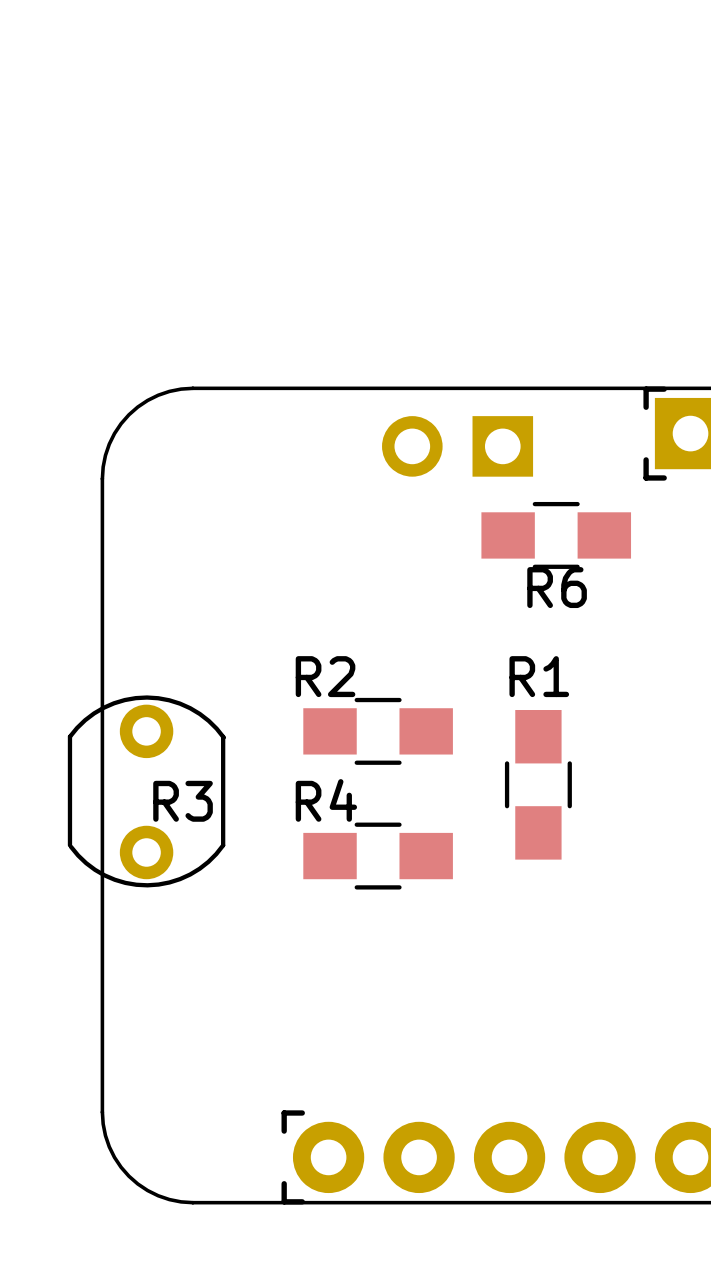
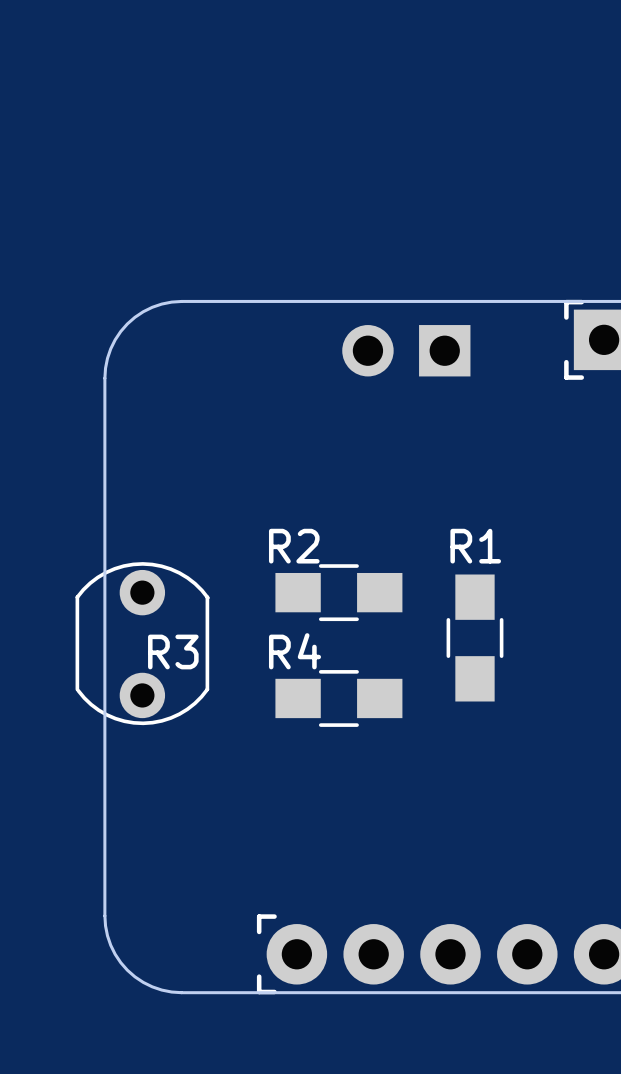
R6: (556, 535) -> none

